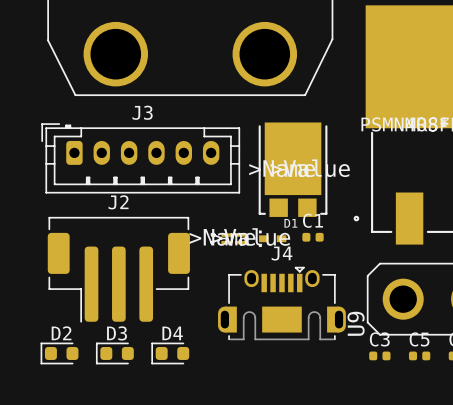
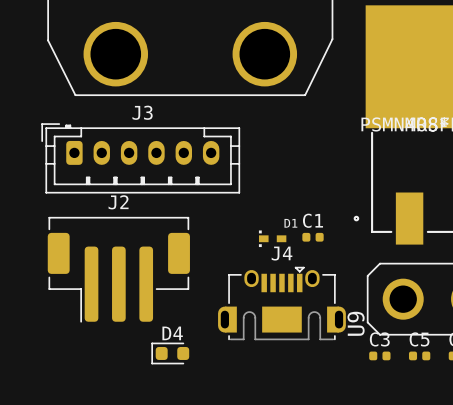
part: (293, 169) -> none
part: (228, 238) -> none
D2: (59, 353) -> none
D3: (114, 353) -> none

